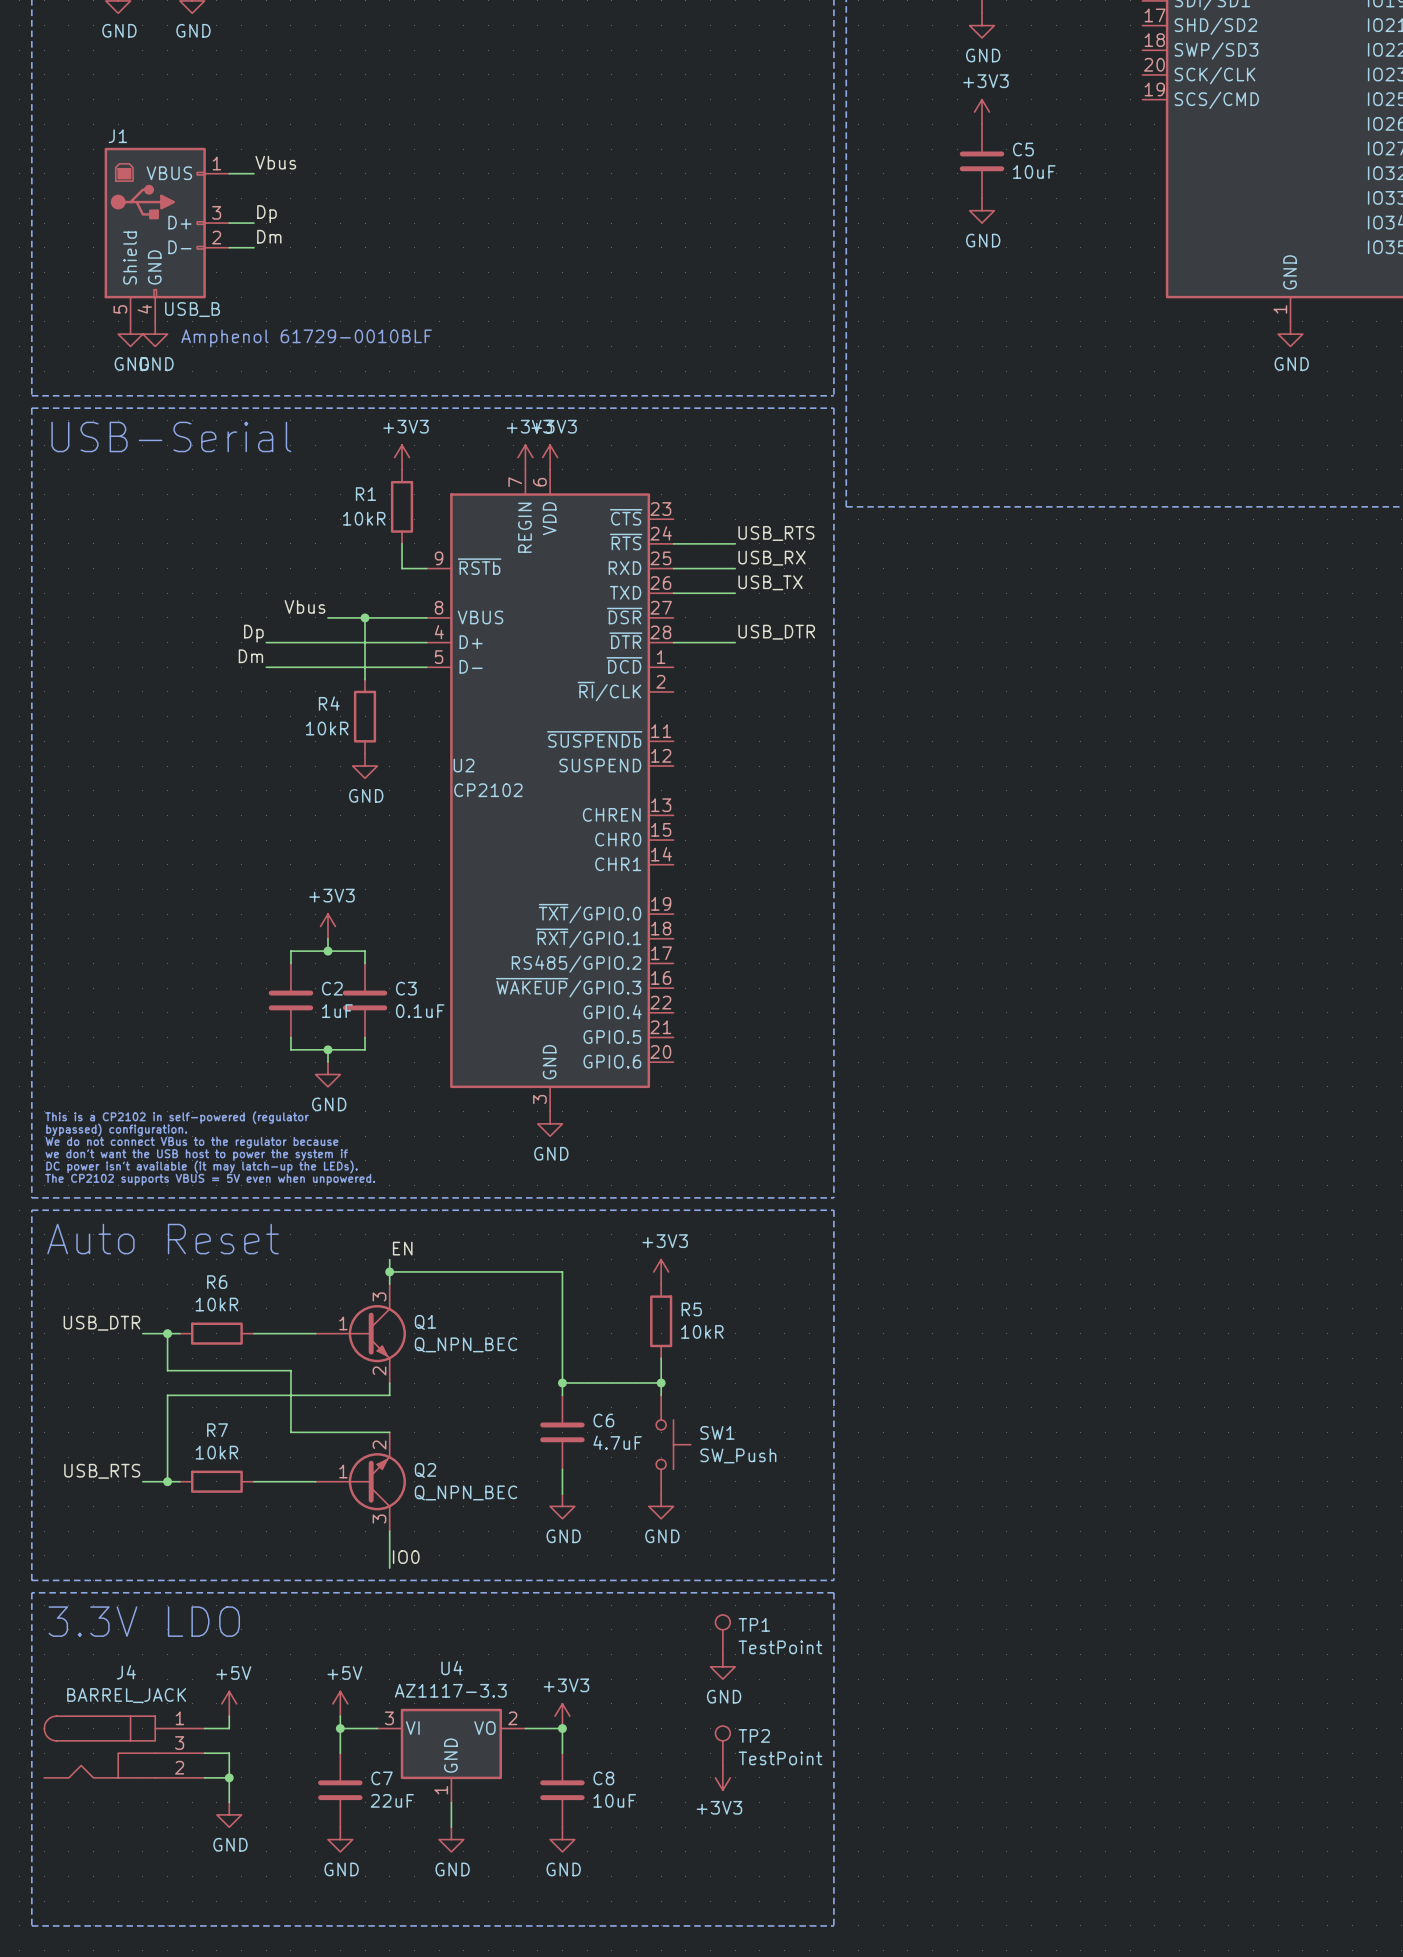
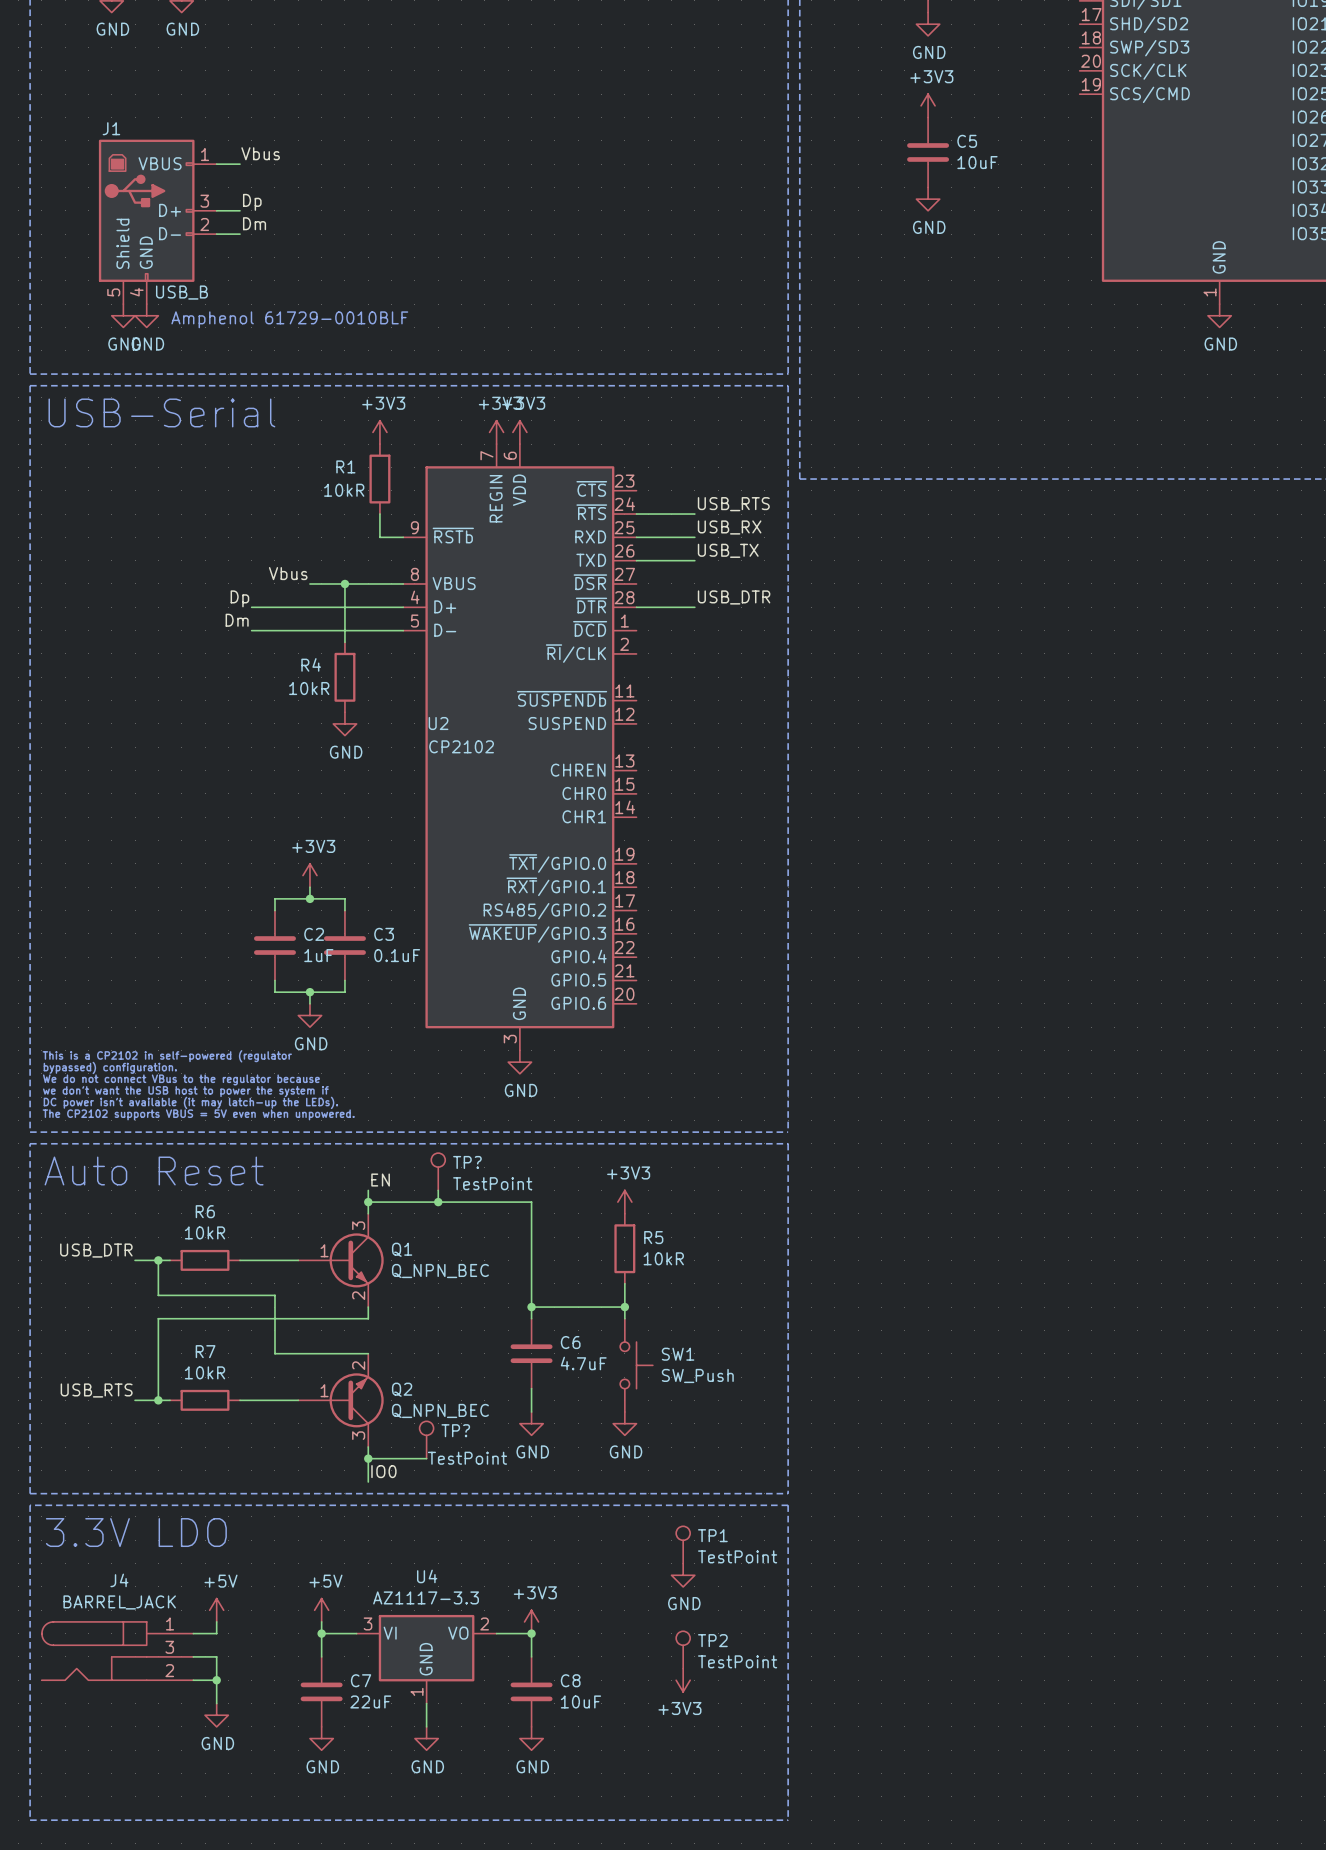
TP?: none -> TestPoint (438, 1171)
wire: none -> (438, 1190) (438, 1202)
junction: none -> (438, 1202)
TP?: none -> TestPoint (426, 1440)
wire: none -> (368, 1458) (426, 1458)
junction: none -> (368, 1458)

